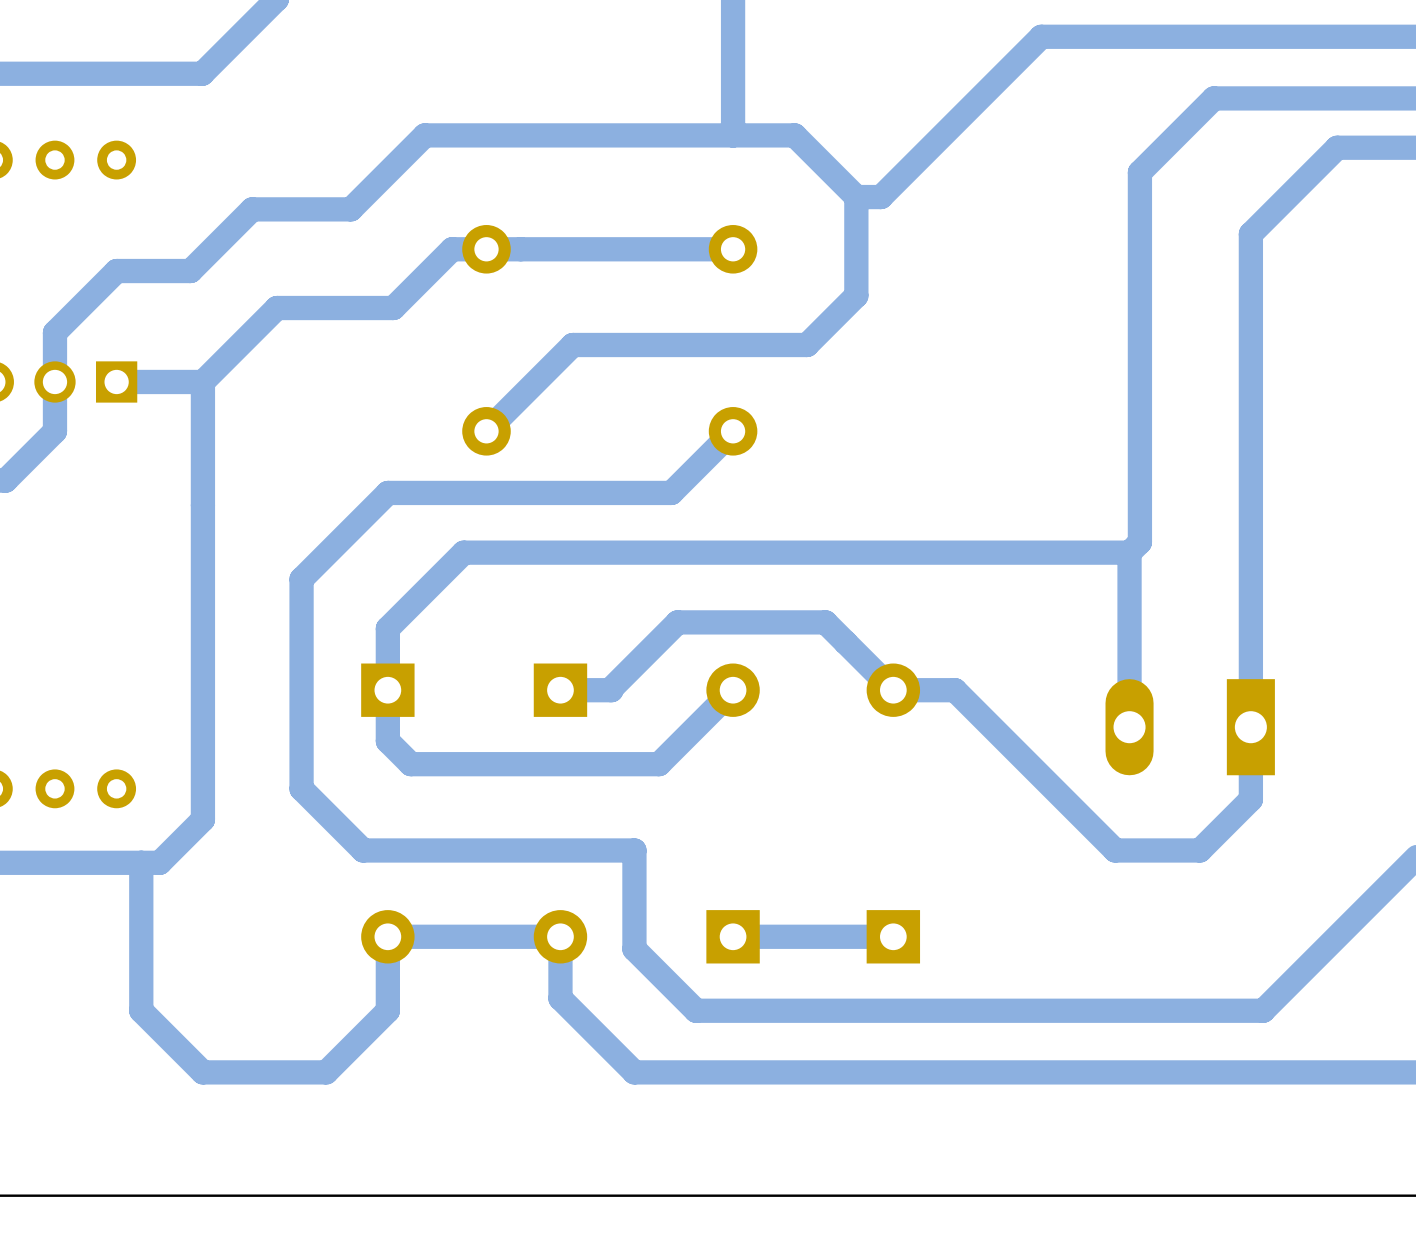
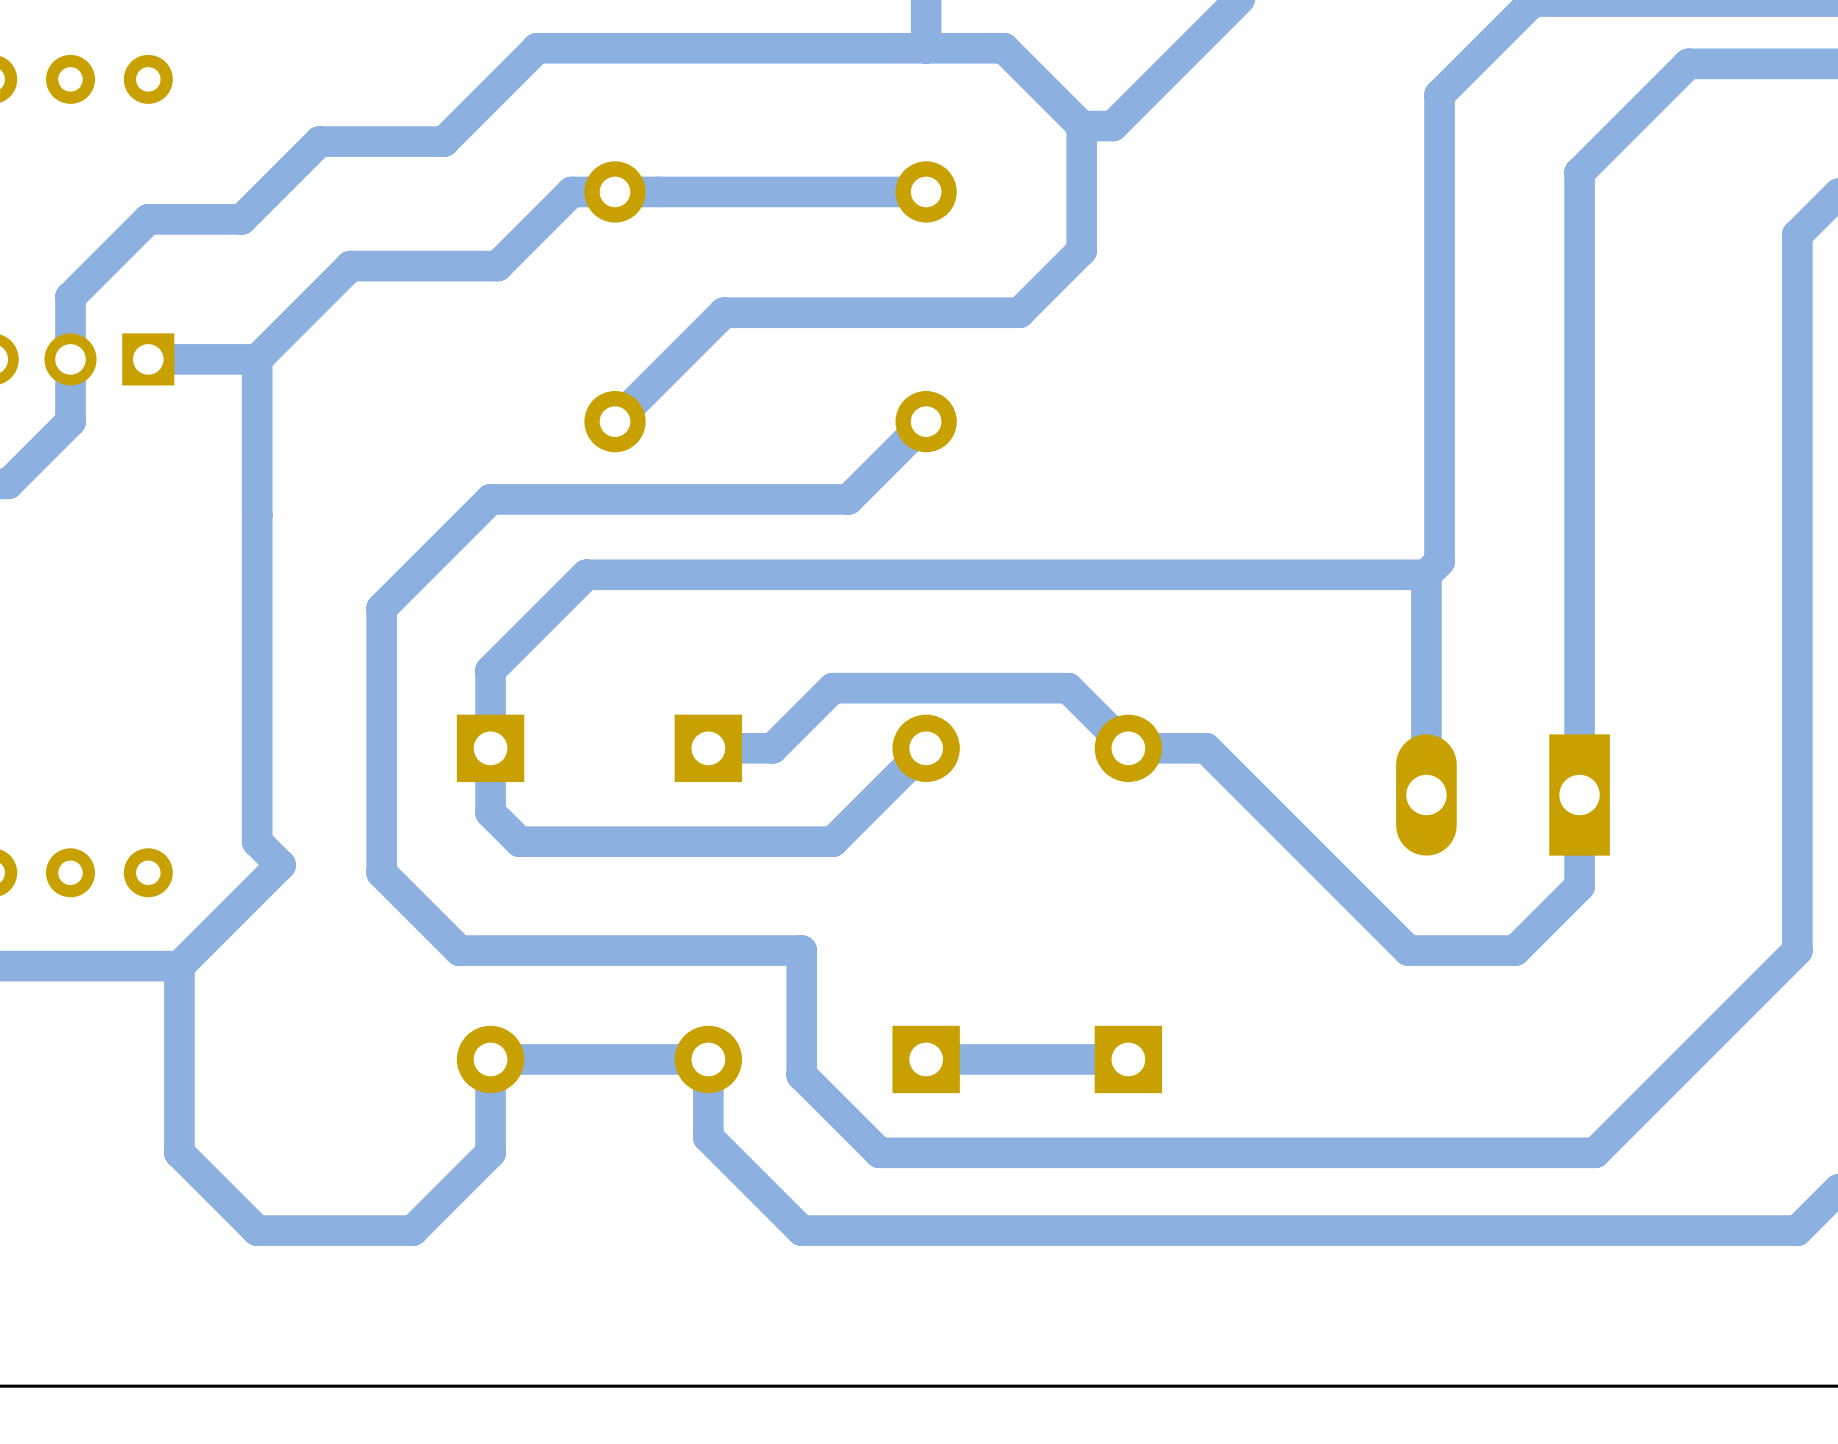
track: (845, 642) (825, 622) (677, 622) (611, 690) -> (1068, 688) (832, 688) (772, 748)
track: (202, 764) (202, 819) (159, 862) (141, 862) -> (257, 841) (280, 865) (179, 966)

